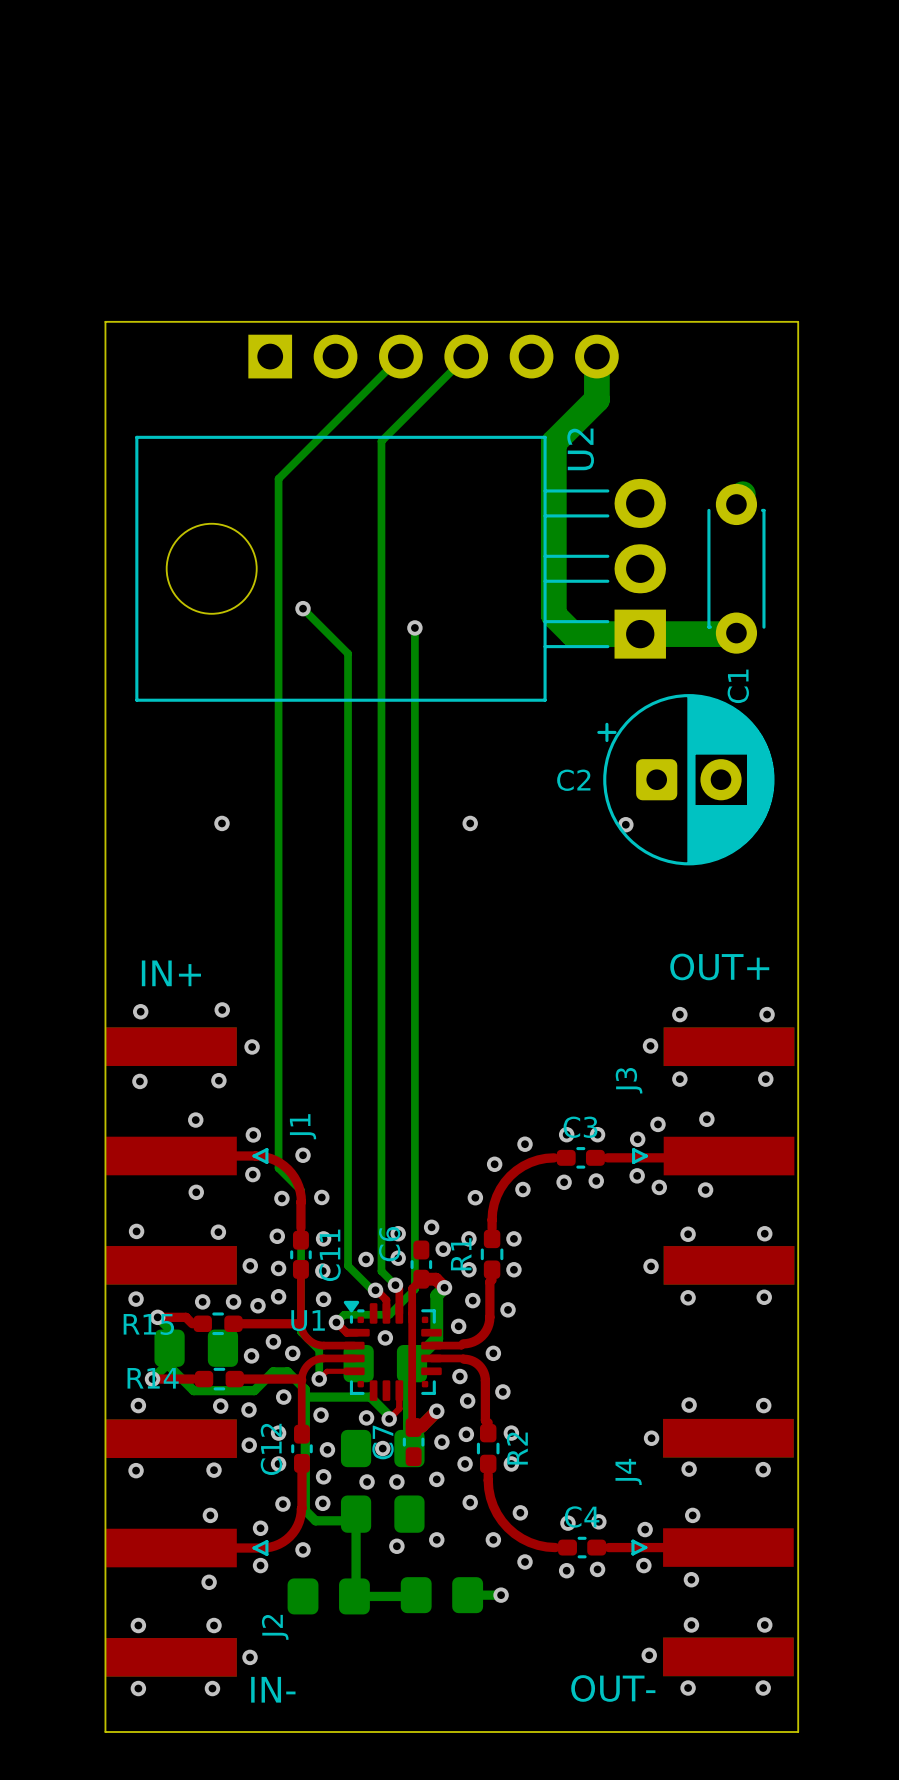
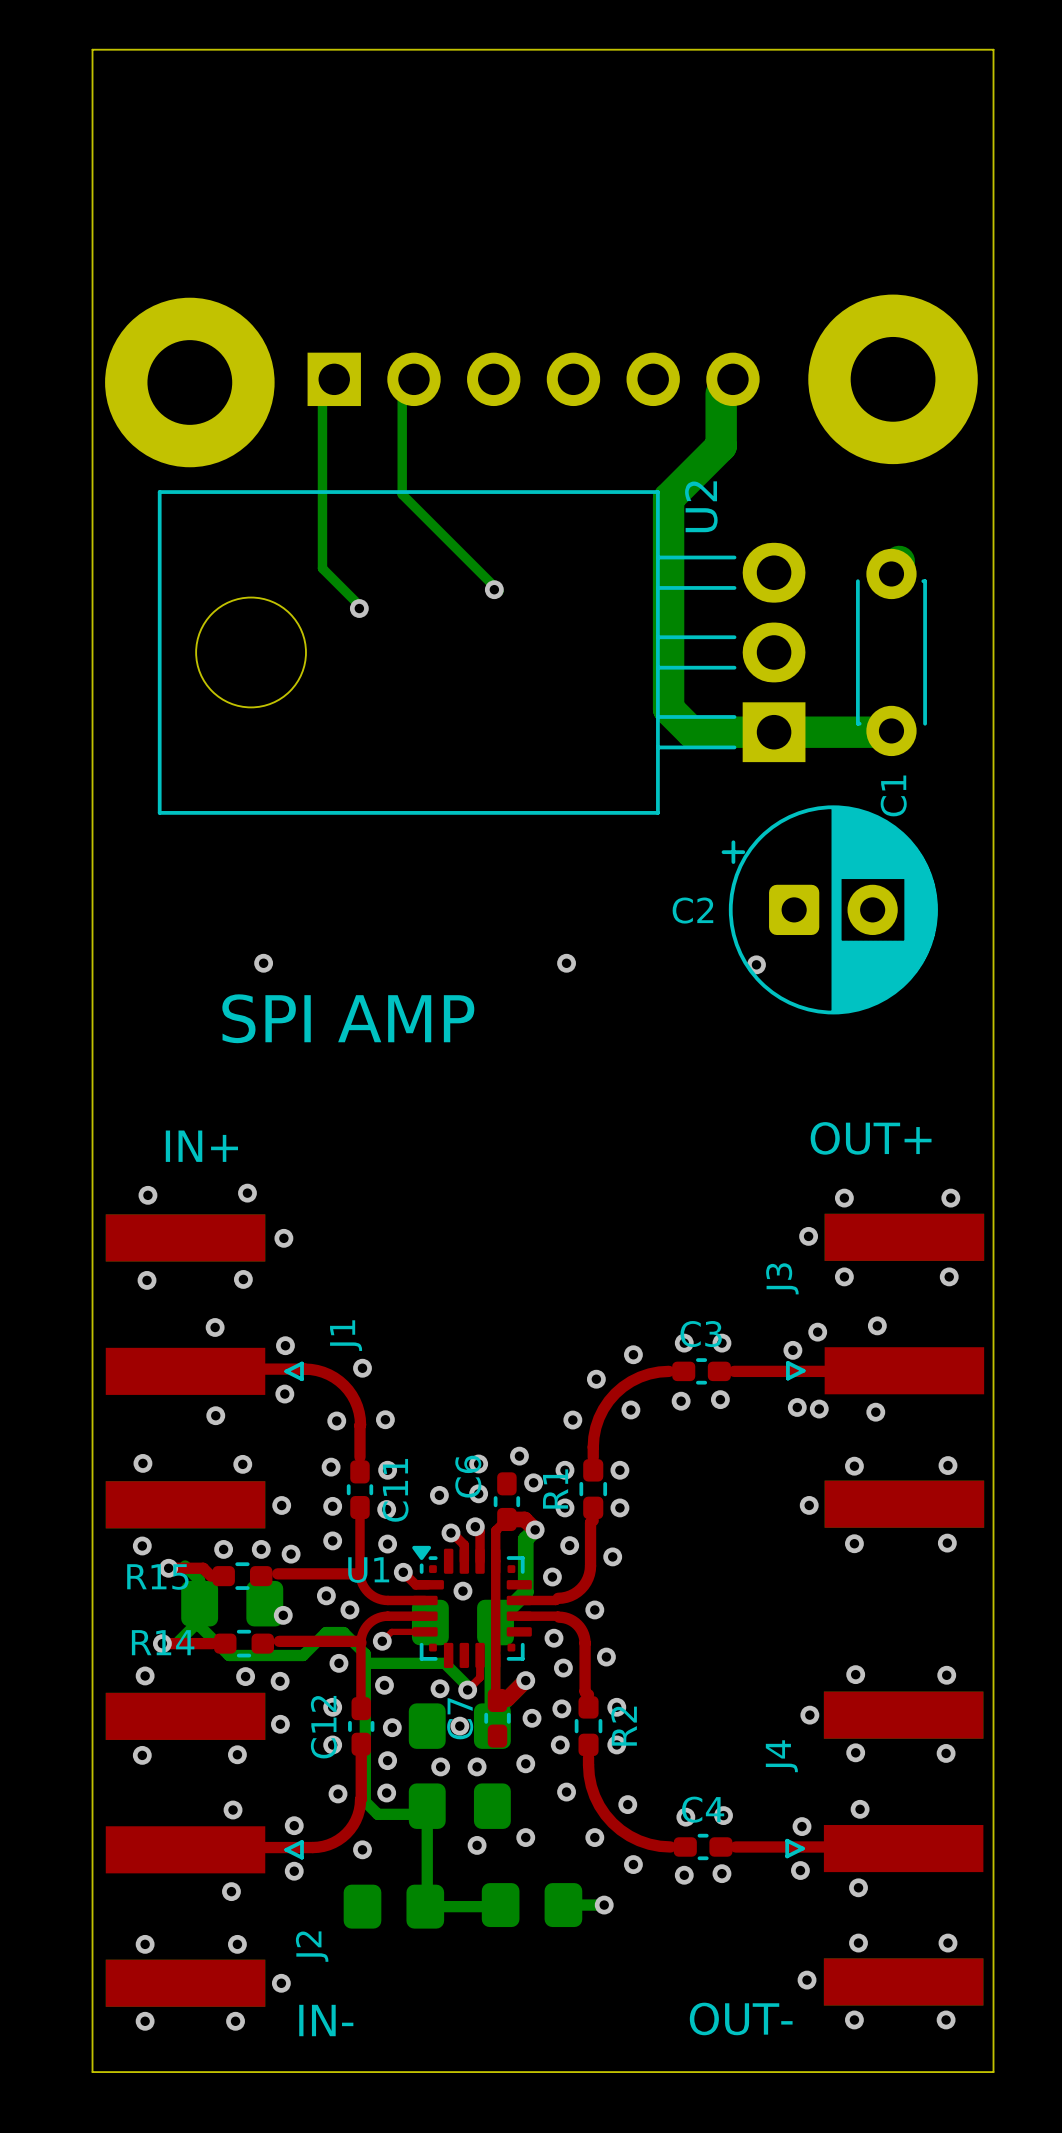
part: none -> (893, 379)
part: none -> (189, 382)
bottom track: none -> (322, 393) (322, 568) (362, 608)
bottom track: none -> (402, 393) (402, 494) (499, 591)
bottom track: (400, 356) (278, 478) (278, 1168) (301, 1190) (301, 1332) (319, 1350) (319, 1378) -> none
part position: (433, 356) -> (533, 379)
bottom track: (466, 356) (381, 441) (381, 1271) (395, 1285) -> none
via: none -> (494, 589)
via: none -> (359, 608)
via: (303, 608) -> none
bottom track: (300, 611) (303, 608) (348, 653) (348, 1265) (372, 1290) -> none
bottom track: (414, 627) (414, 1289) (389, 1314) (344, 1314) (336, 1322) -> none
via: (414, 627) -> none
text: none -> SPI AMP (348, 1018)
via position: (222, 1009) -> (247, 1193)
via position: (140, 1011) -> (147, 1195)
via: (679, 1014) -> none
via position: (767, 1014) -> (950, 1198)
via: none -> (844, 1198)
via: (650, 1045) -> none
via position: (252, 1046) -> (283, 1238)
via: none -> (808, 1236)
via: (679, 1079) -> none
via position: (765, 1079) -> (949, 1276)
via position: (218, 1080) -> (243, 1279)
via: none -> (844, 1276)
via position: (139, 1081) -> (147, 1280)
via: (706, 1119) -> none
via position: (195, 1120) -> (215, 1327)
via: none -> (877, 1325)
via: (657, 1124) -> none
via: none -> (817, 1332)
via position: (253, 1134) -> (285, 1345)
via: (637, 1139) -> none
via: none -> (792, 1350)
J1 position: (187, 1156) -> (204, 1371)
J3 position: (713, 1156) -> (885, 1370)
via position: (252, 1174) -> (284, 1394)
via: (637, 1175) -> none
via: none -> (819, 1409)
via: (705, 1190) -> none
via: none -> (875, 1412)
via position: (196, 1192) -> (215, 1415)
via position: (136, 1231) -> (142, 1463)
via position: (218, 1232) -> (242, 1464)
via position: (764, 1233) -> (947, 1465)
via position: (688, 1234) -> (854, 1466)
via position: (250, 1265) -> (281, 1505)
via: (651, 1266) -> none
via: none -> (809, 1505)
via: (688, 1297) -> none
via position: (764, 1297) -> (947, 1543)
via position: (136, 1299) -> (142, 1545)
via: none -> (854, 1543)
via position: (202, 1301) -> (223, 1549)
via: (233, 1301) -> none
via: none -> (261, 1549)
via: (257, 1305) -> none
via: none -> (291, 1554)
top track: (157, 1317) (185, 1317) (192, 1323) -> (168, 1568) (203, 1568) (211, 1576)
via position: (157, 1317) -> (168, 1568)
R15 position: (218, 1323) -> (242, 1576)
via position: (251, 1355) -> (283, 1615)
top track: (152, 1379) (193, 1379) -> (162, 1643) (212, 1643)
via position: (152, 1379) -> (162, 1643)
R14 position: (219, 1379) -> (244, 1643)
via position: (138, 1405) -> (145, 1675)
via position: (689, 1405) -> (855, 1674)
via position: (763, 1405) -> (946, 1675)
via: (220, 1406) -> none
via: none -> (245, 1676)
via: (248, 1409) -> none
via: none -> (280, 1681)
via: (651, 1438) -> none
via: none -> (809, 1715)
via position: (249, 1445) -> (280, 1724)
via: (689, 1469) -> none
via position: (763, 1469) -> (946, 1753)
via position: (136, 1470) -> (142, 1755)
via position: (214, 1470) -> (237, 1754)
via: none -> (855, 1752)
via position: (210, 1515) -> (233, 1810)
via: (692, 1515) -> none
via: none -> (860, 1809)
via position: (260, 1528) -> (294, 1825)
via: (645, 1529) -> none
via: none -> (802, 1826)
J4 position: (712, 1547) -> (884, 1848)
J2 position: (187, 1548) -> (204, 1849)
via position: (260, 1565) -> (294, 1871)
via: (643, 1565) -> none
via: none -> (800, 1870)
via: (691, 1579) -> none
via: none -> (858, 1887)
via position: (209, 1582) -> (231, 1891)
via position: (691, 1624) -> (858, 1943)
via position: (764, 1624) -> (947, 1943)
via position: (138, 1625) -> (145, 1944)
via position: (214, 1625) -> (237, 1944)
via position: (649, 1655) -> (807, 1980)
via position: (250, 1657) -> (281, 1983)
via position: (138, 1688) -> (145, 2021)
via position: (212, 1688) -> (235, 2021)
via position: (688, 1688) -> (854, 2019)
via position: (763, 1688) -> (946, 2019)
board edge: (105, 1732) (105, 321) (798, 321) (798, 1732) -> (121, 2072) (92, 2072) (92, 49) (993, 49) (993, 2072) (966, 2072)

